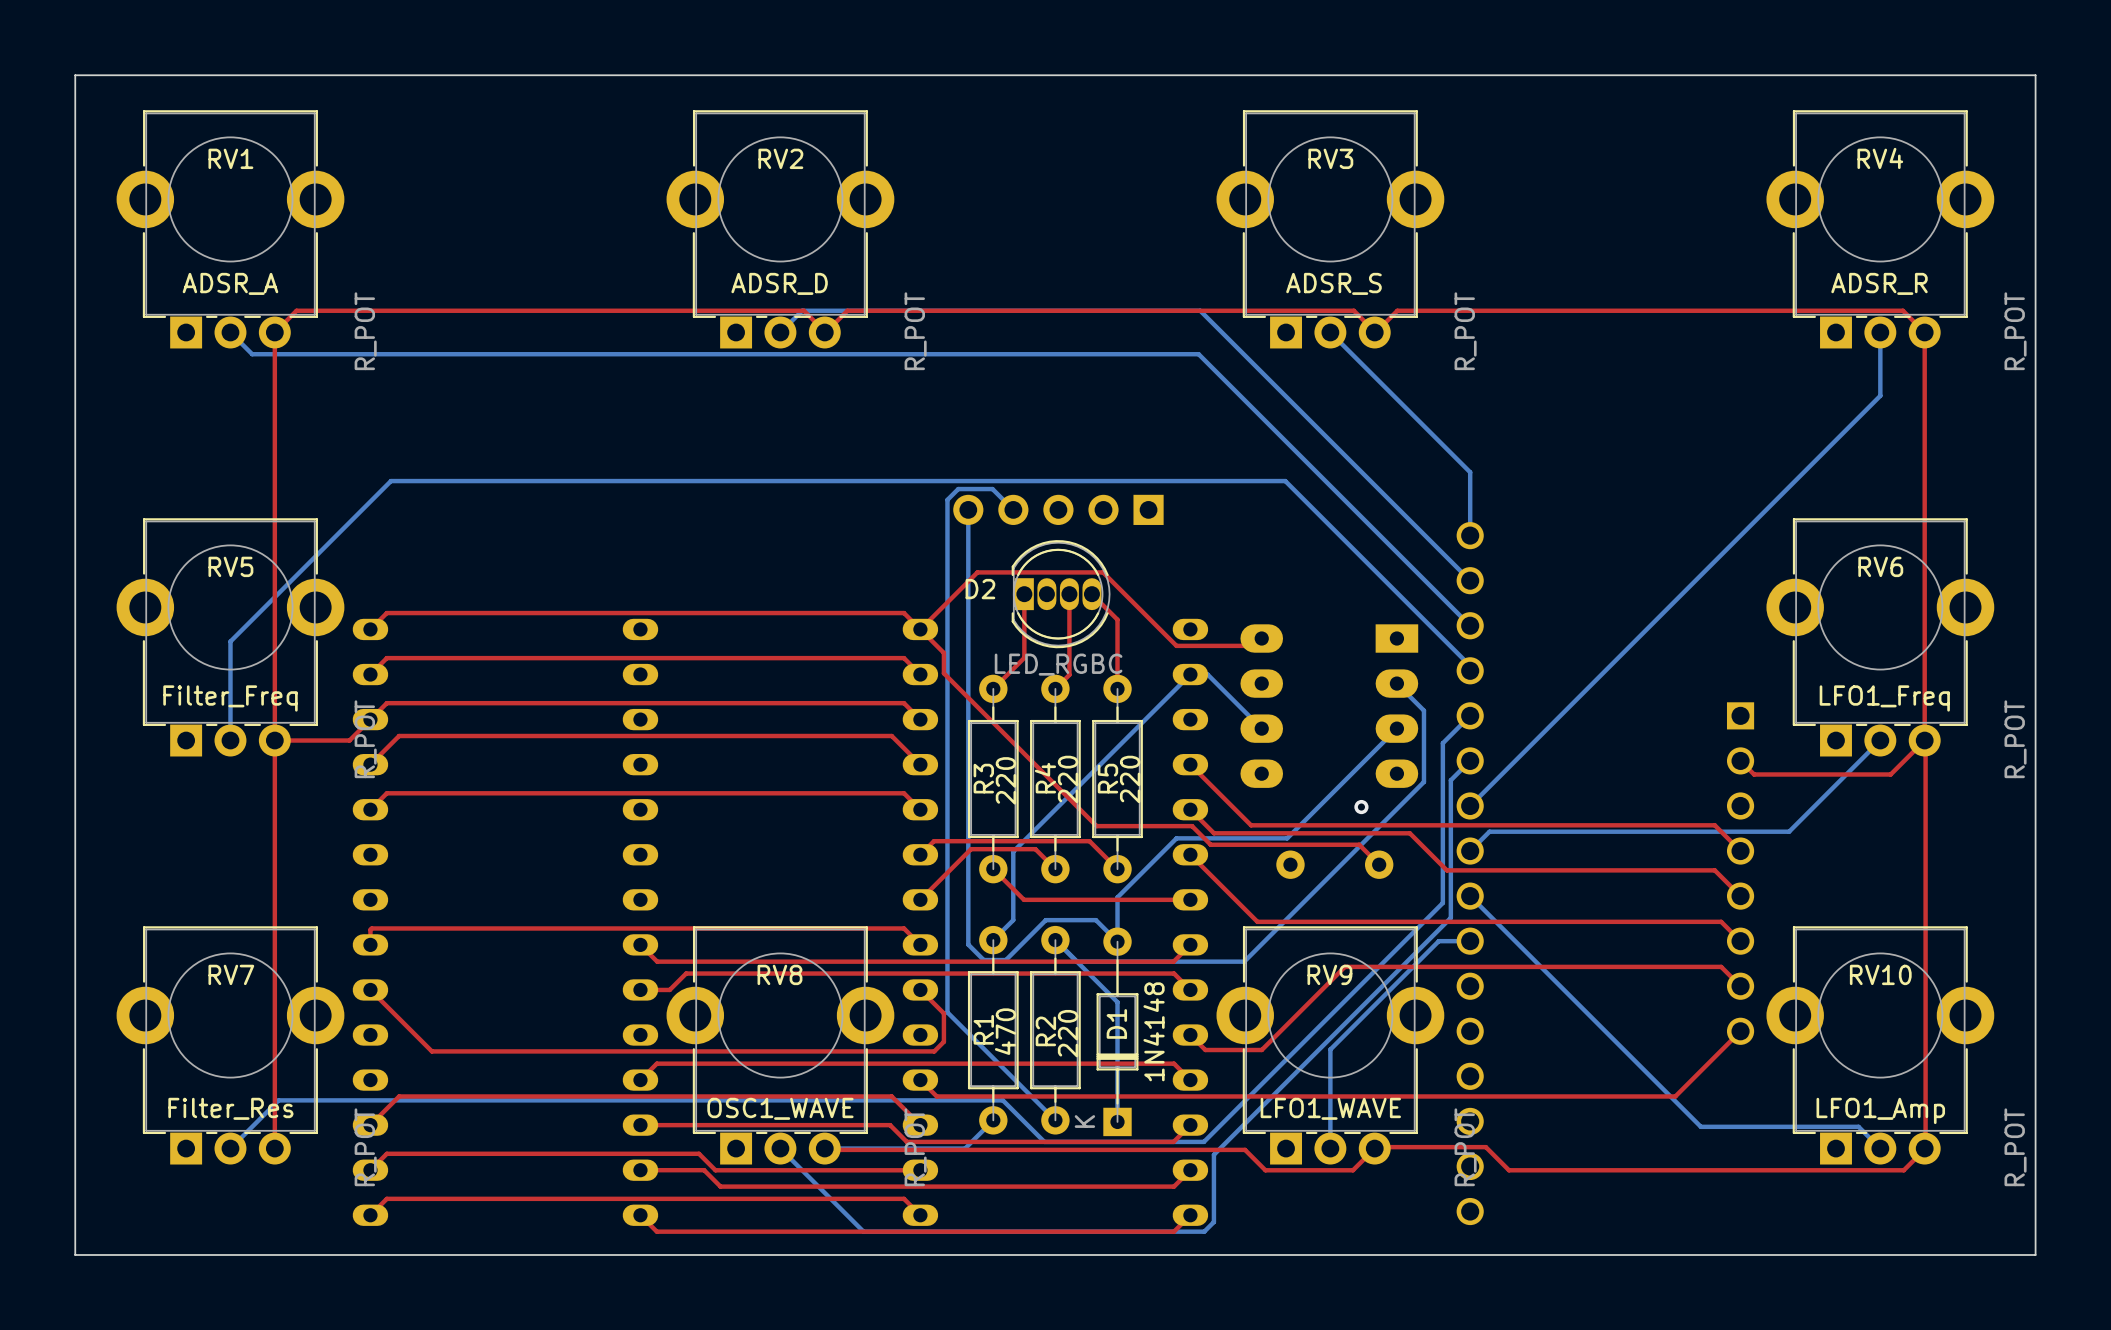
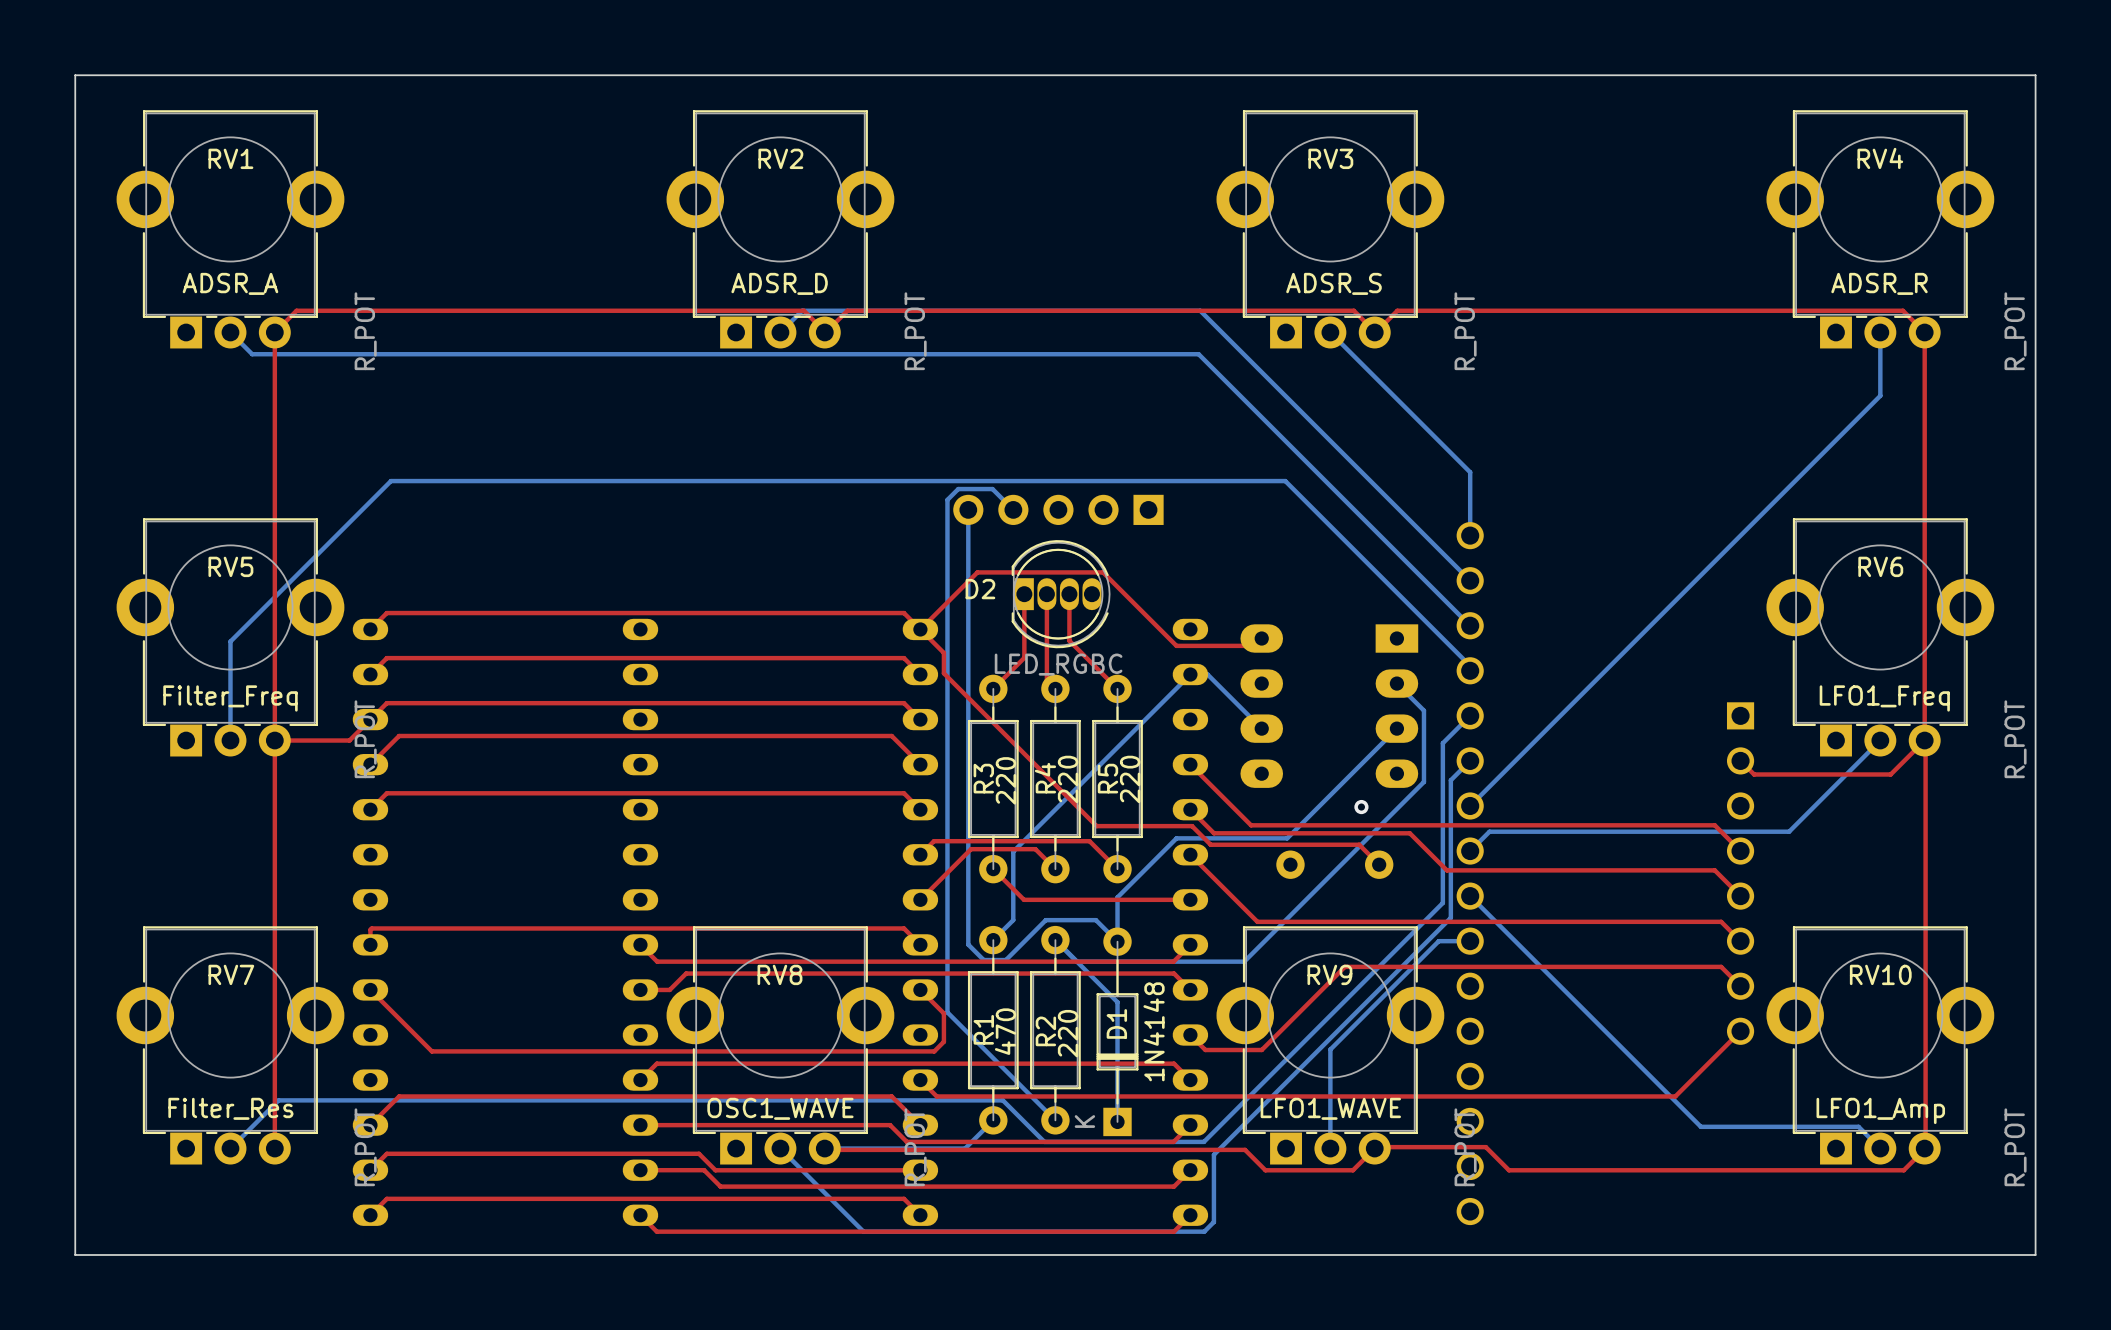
top track: none -> (1046, 594) (1046, 680)
top track: (1091, 594) (1117, 619) (1117, 688) -> (1069, 640) (1117, 688)
top track: (1069, 640) (1069, 674) (1055, 688) -> none

